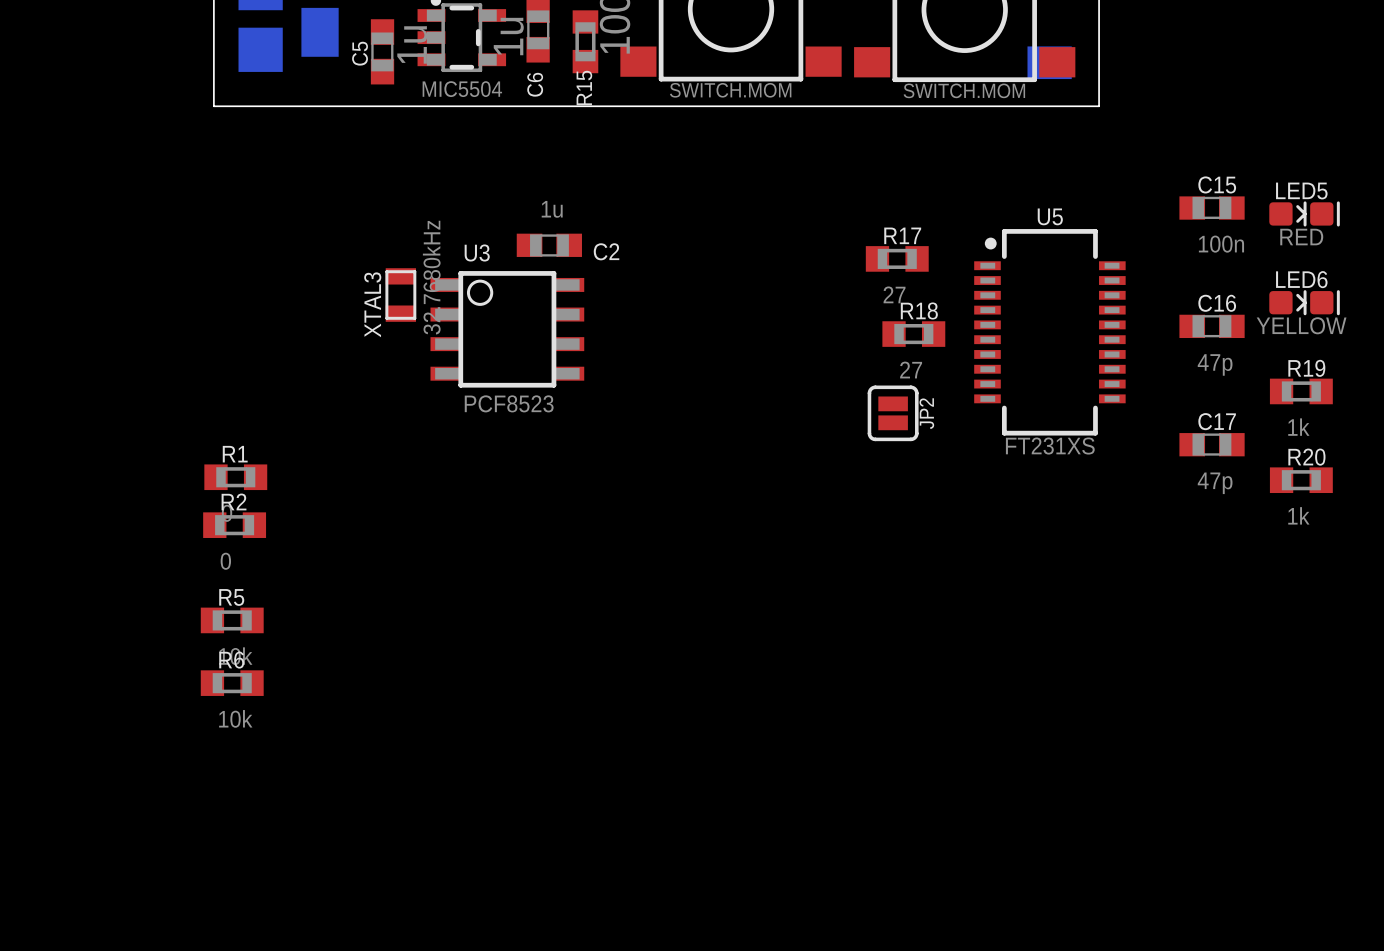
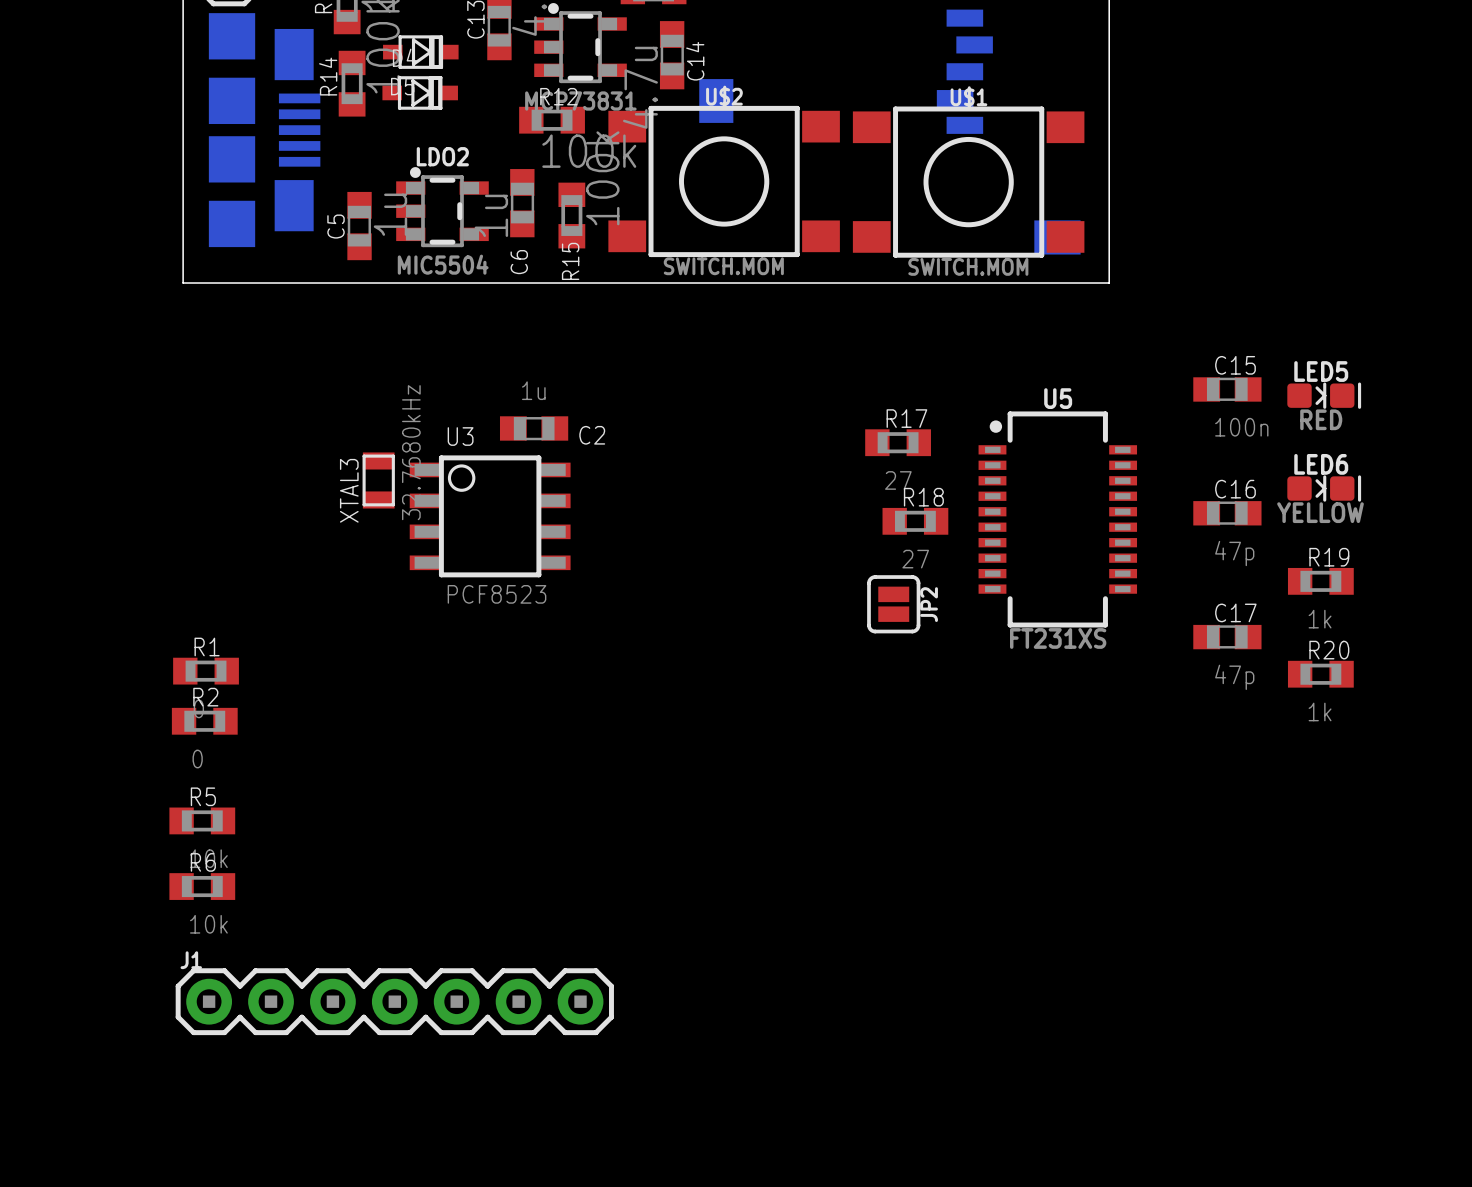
J1: none -> (394, 1001)

